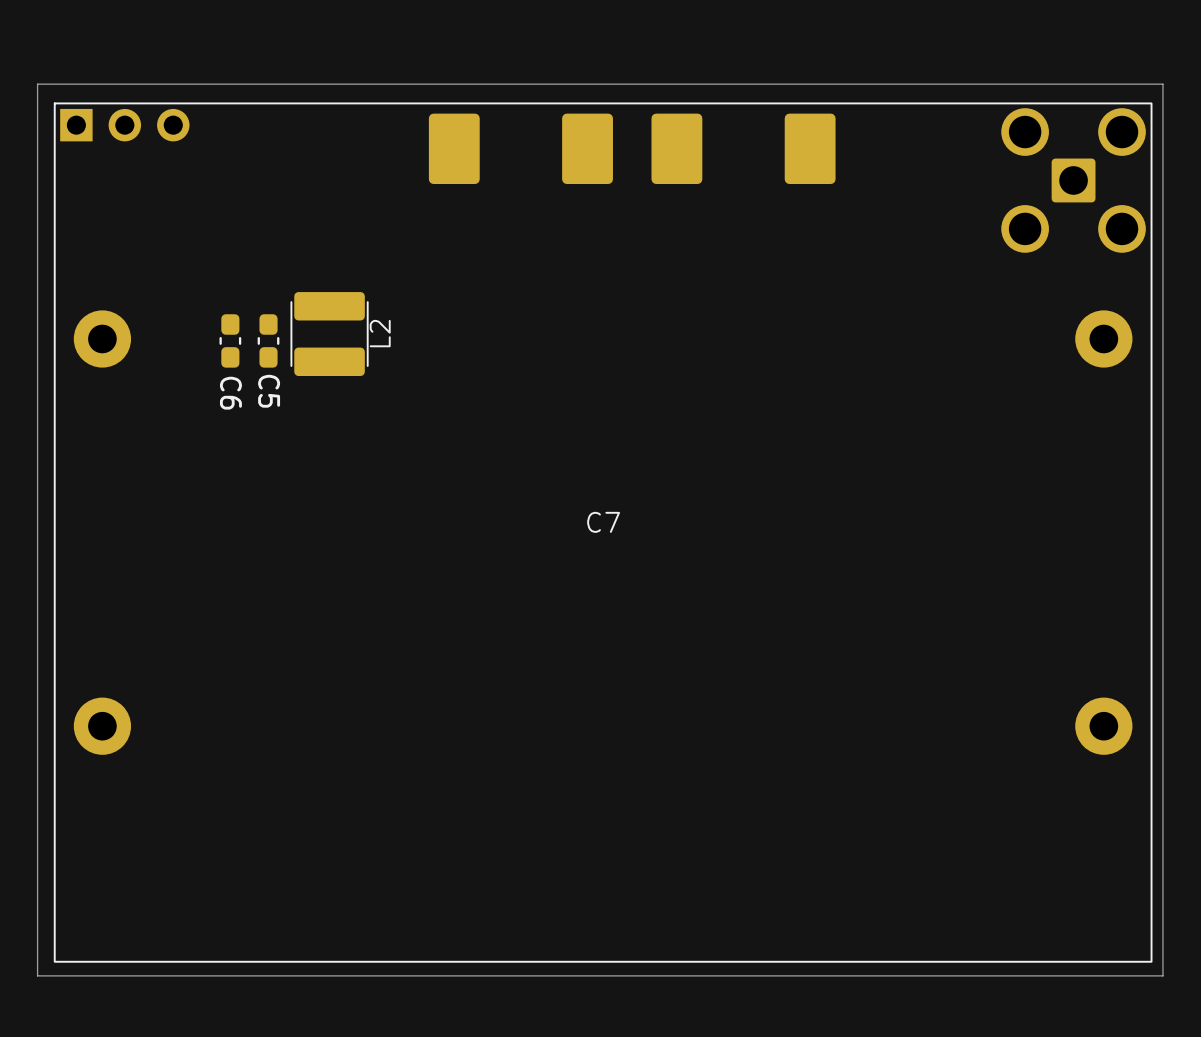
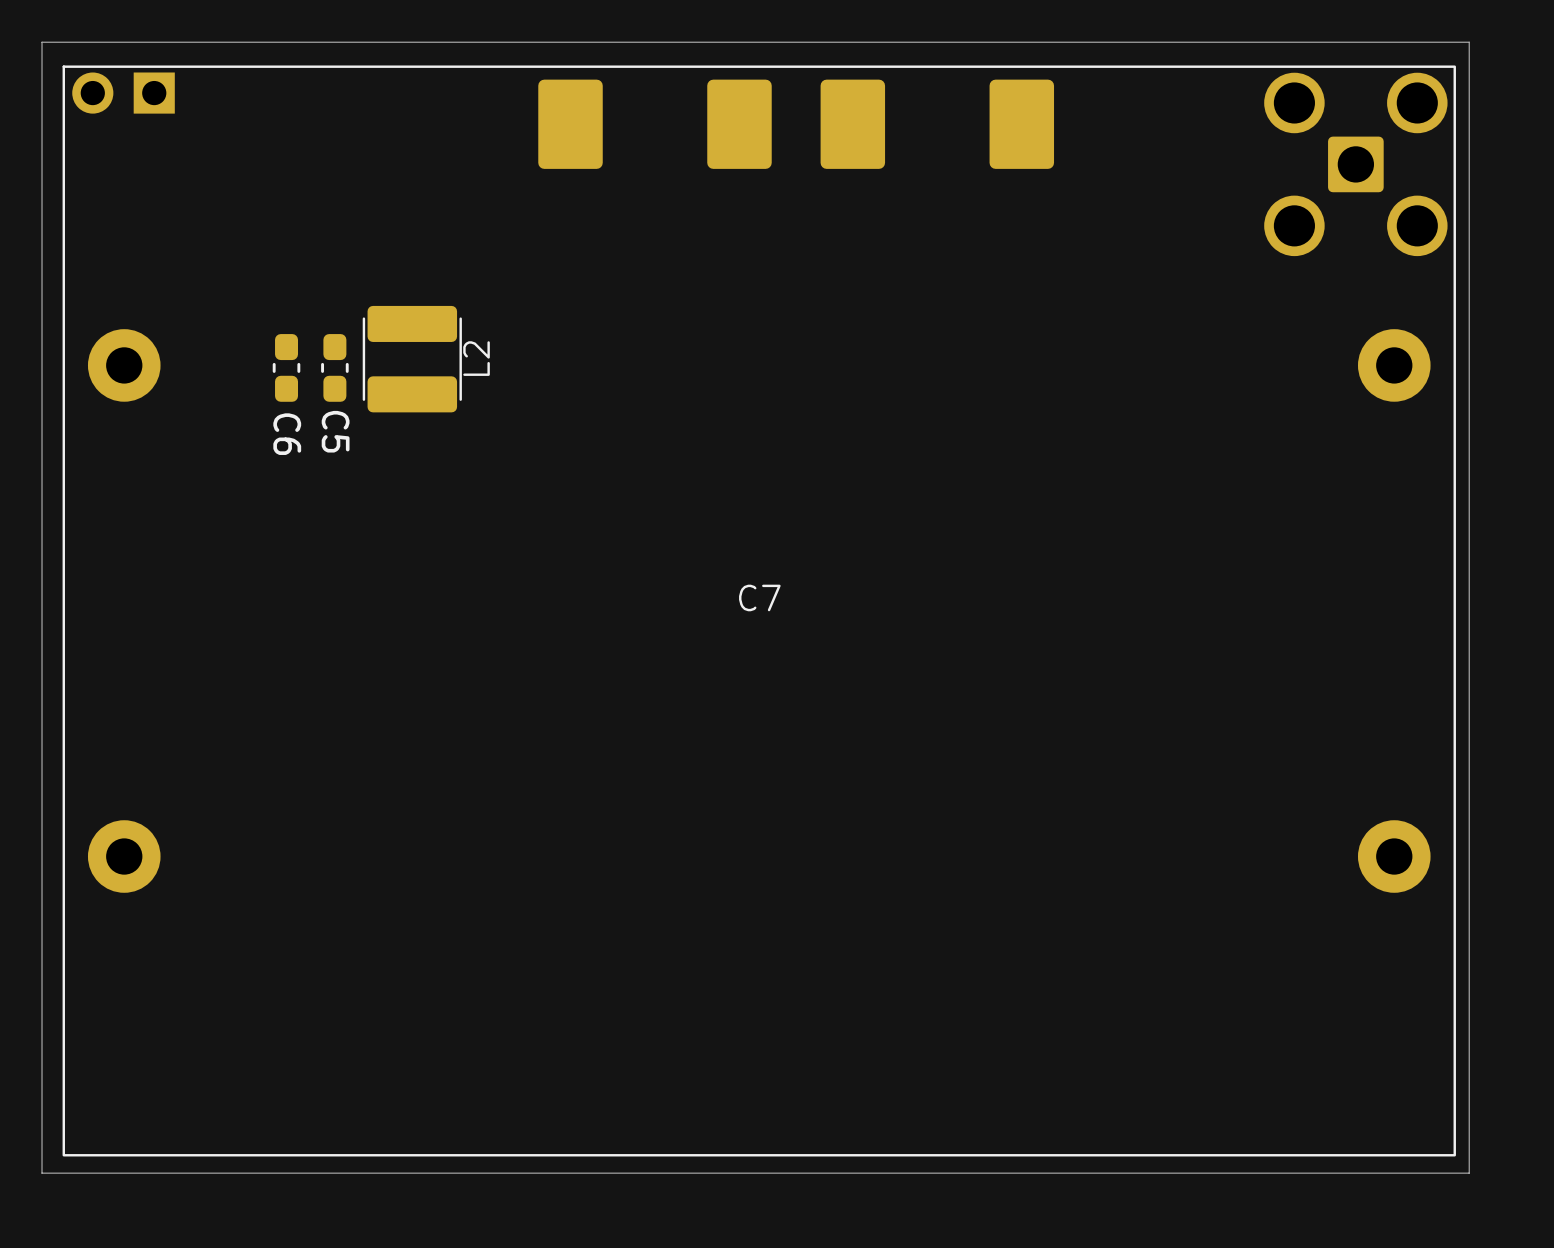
part: none -> (123, 93)
part: (124, 125) -> none

